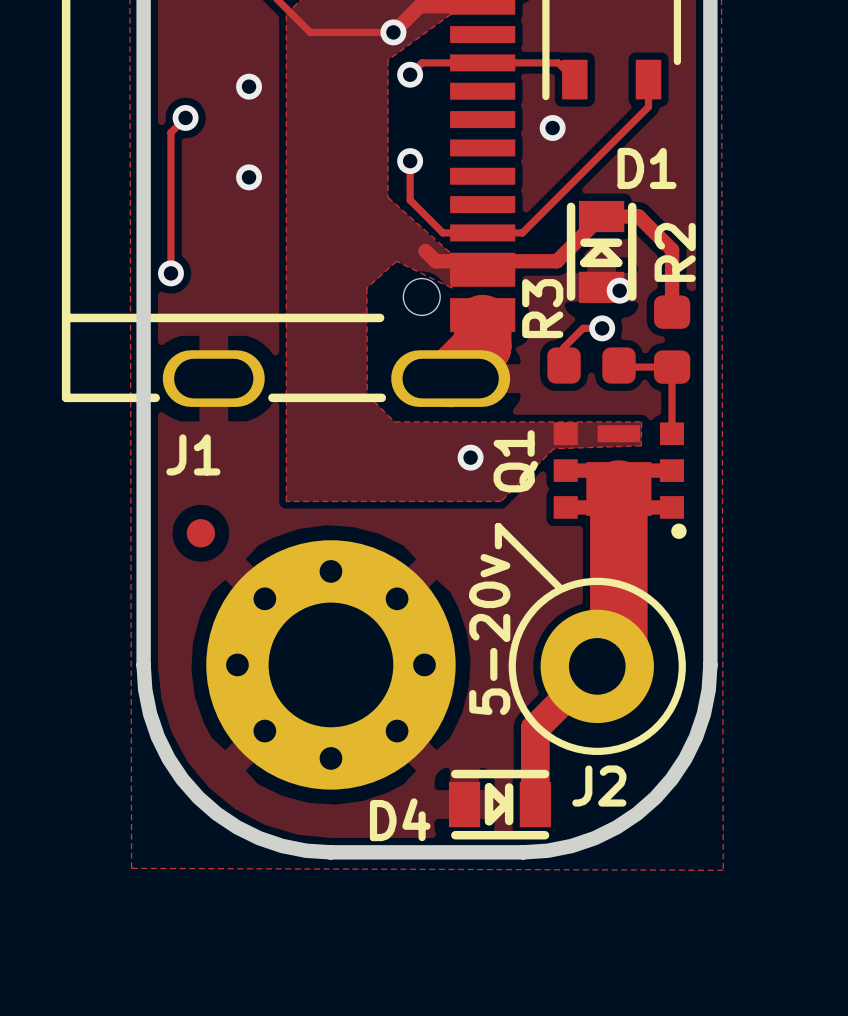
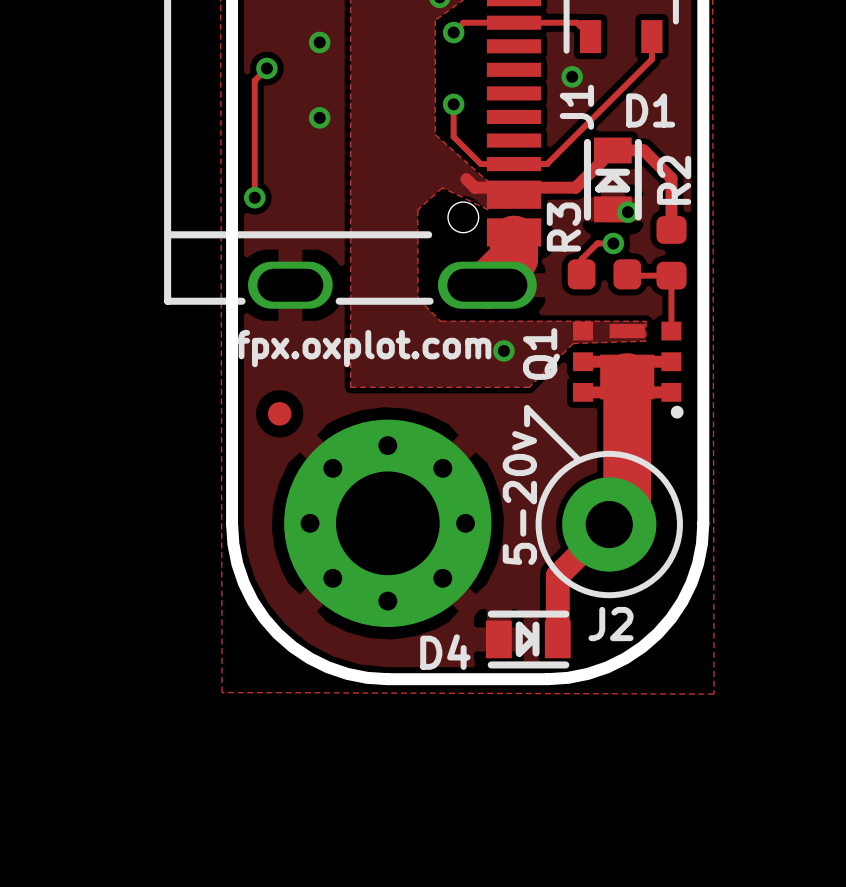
J1 name rotation: 0° (193, 454) -> 90° counterclockwise (576, 107)
J1 name position: J1 (193, 454) -> J1 (576, 107)
text: none -> fpx.oxplot.com (363, 348)

